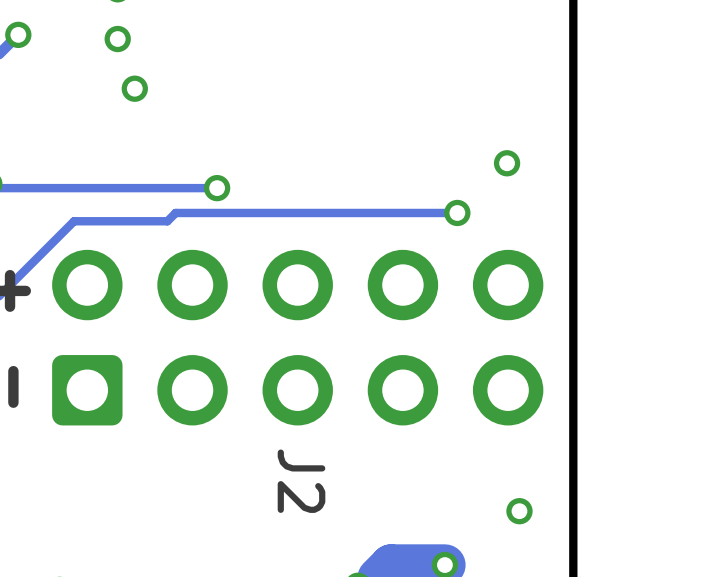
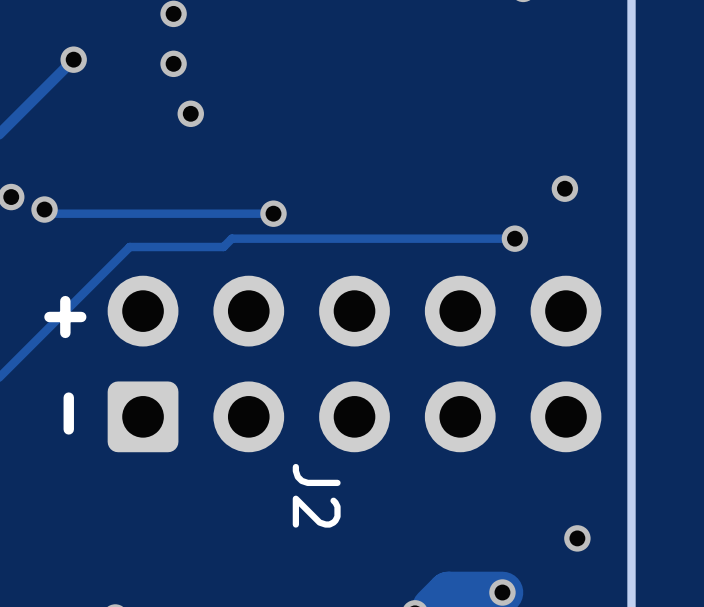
J2 name position: J2 (301, 481) -> J2 (316, 495)

